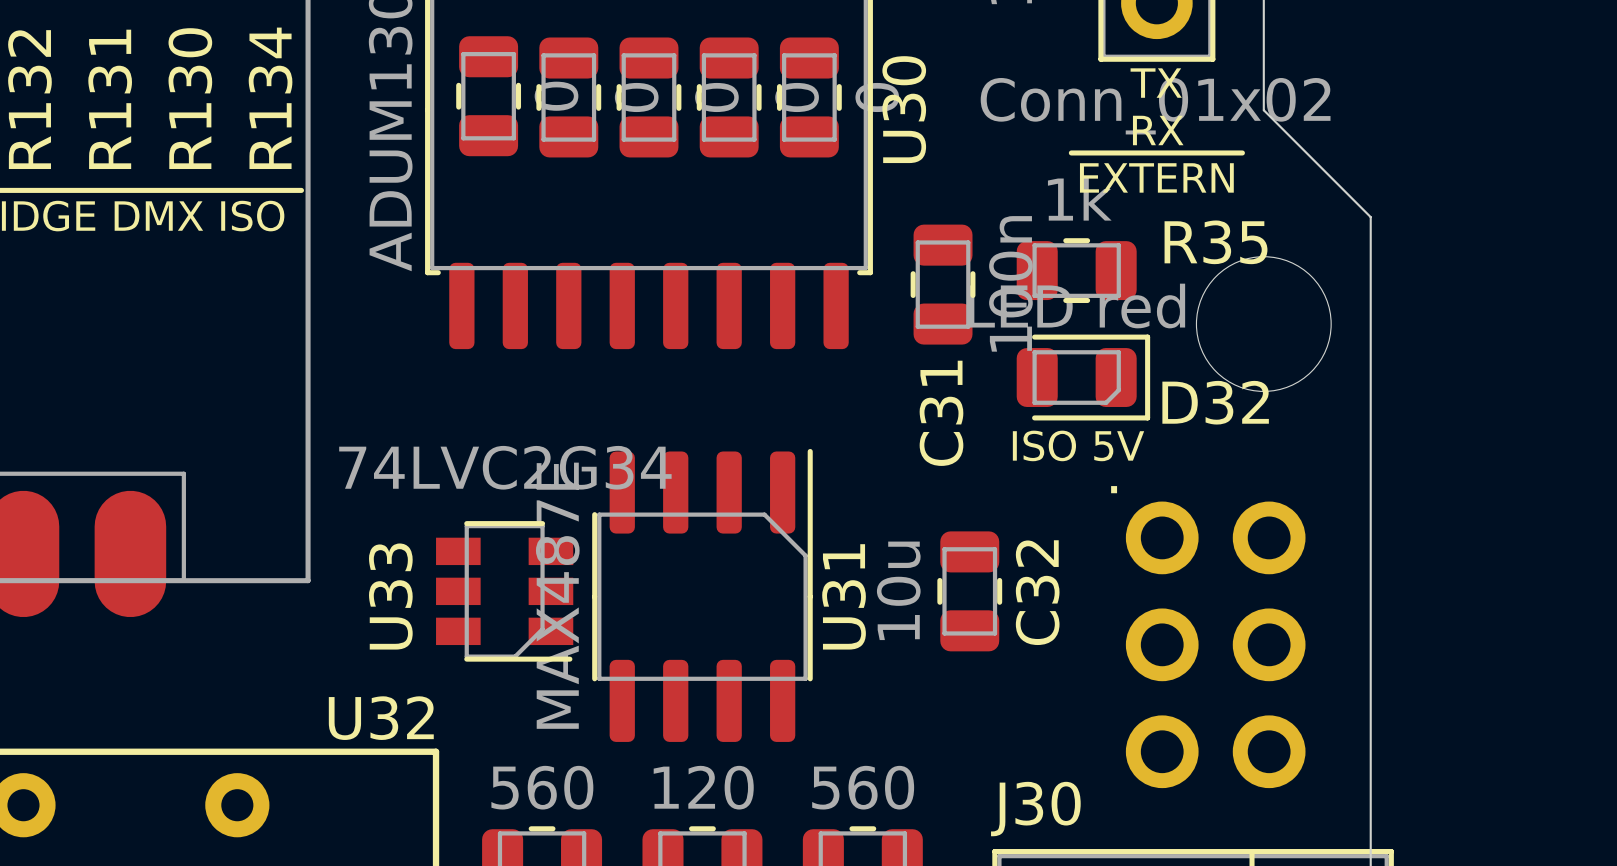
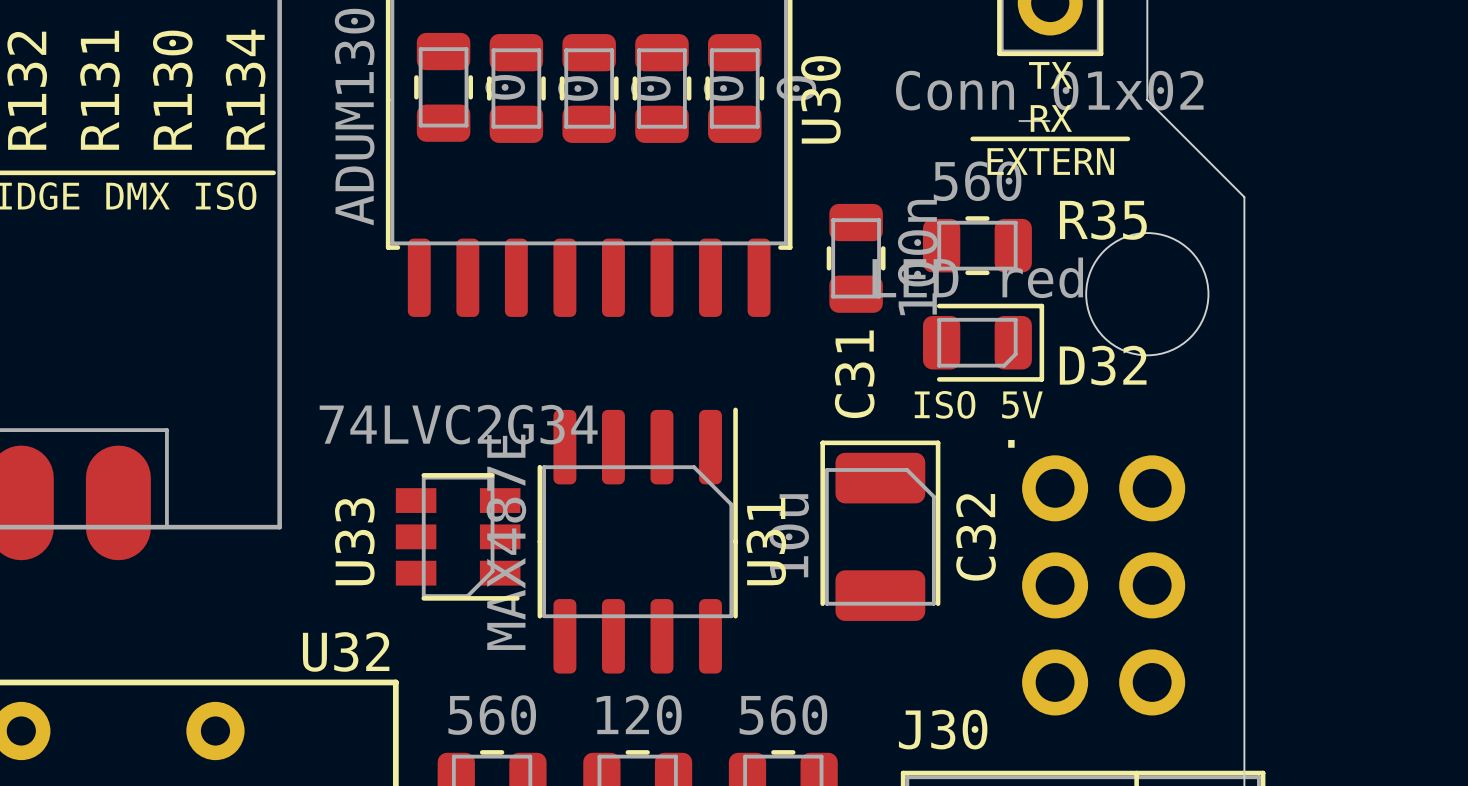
R35 value: 1k (1079, 198) -> 560 (977, 181)
C32 footprint: [937, 531, 1003, 652] -> [820, 440, 941, 621]

